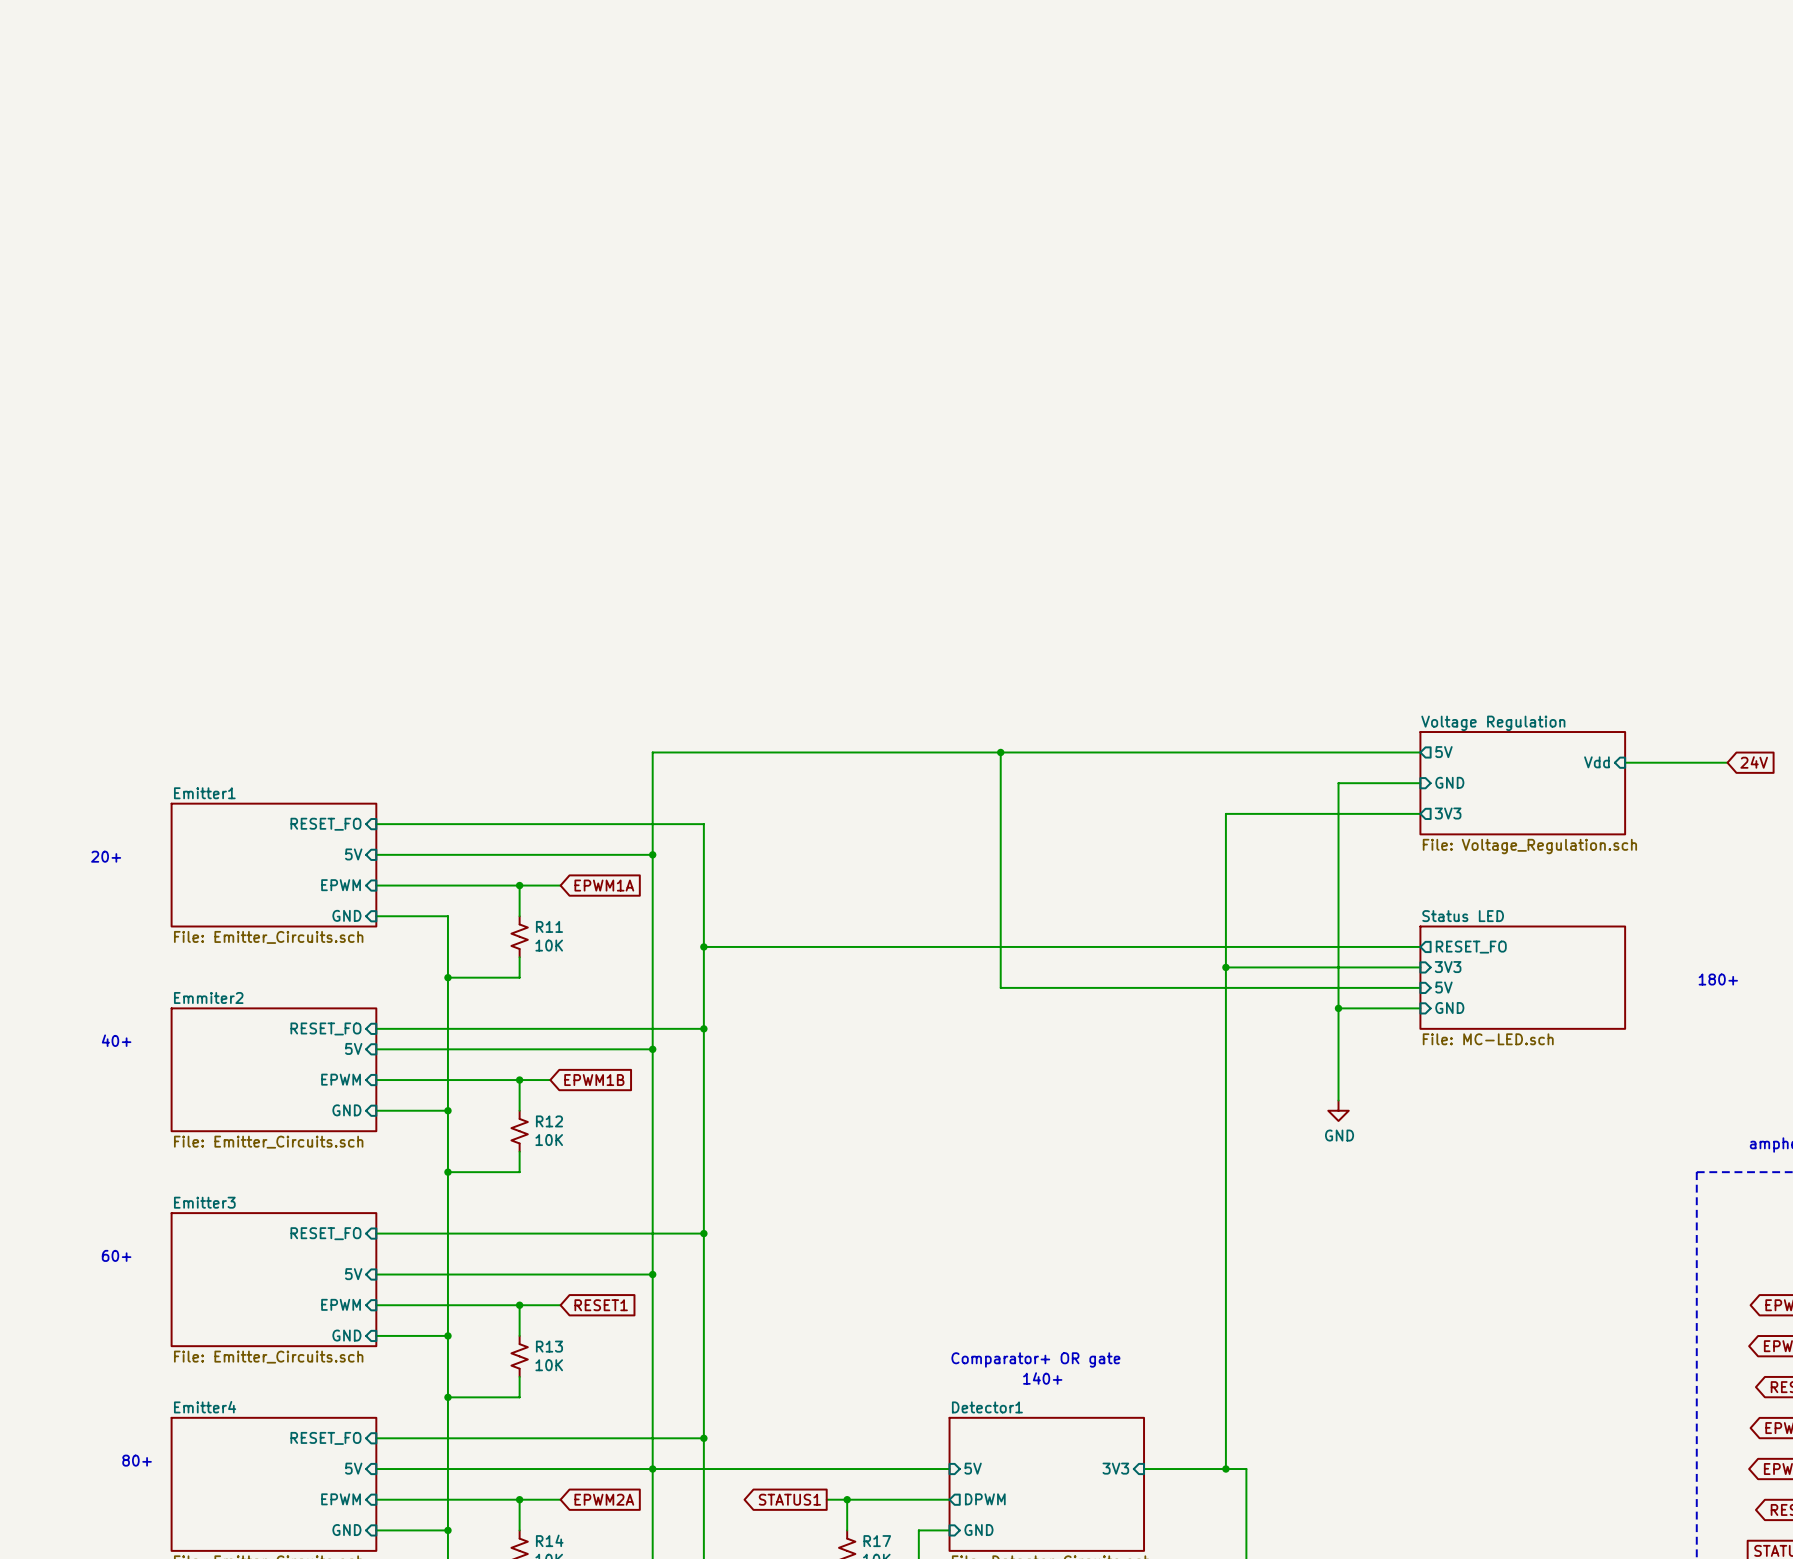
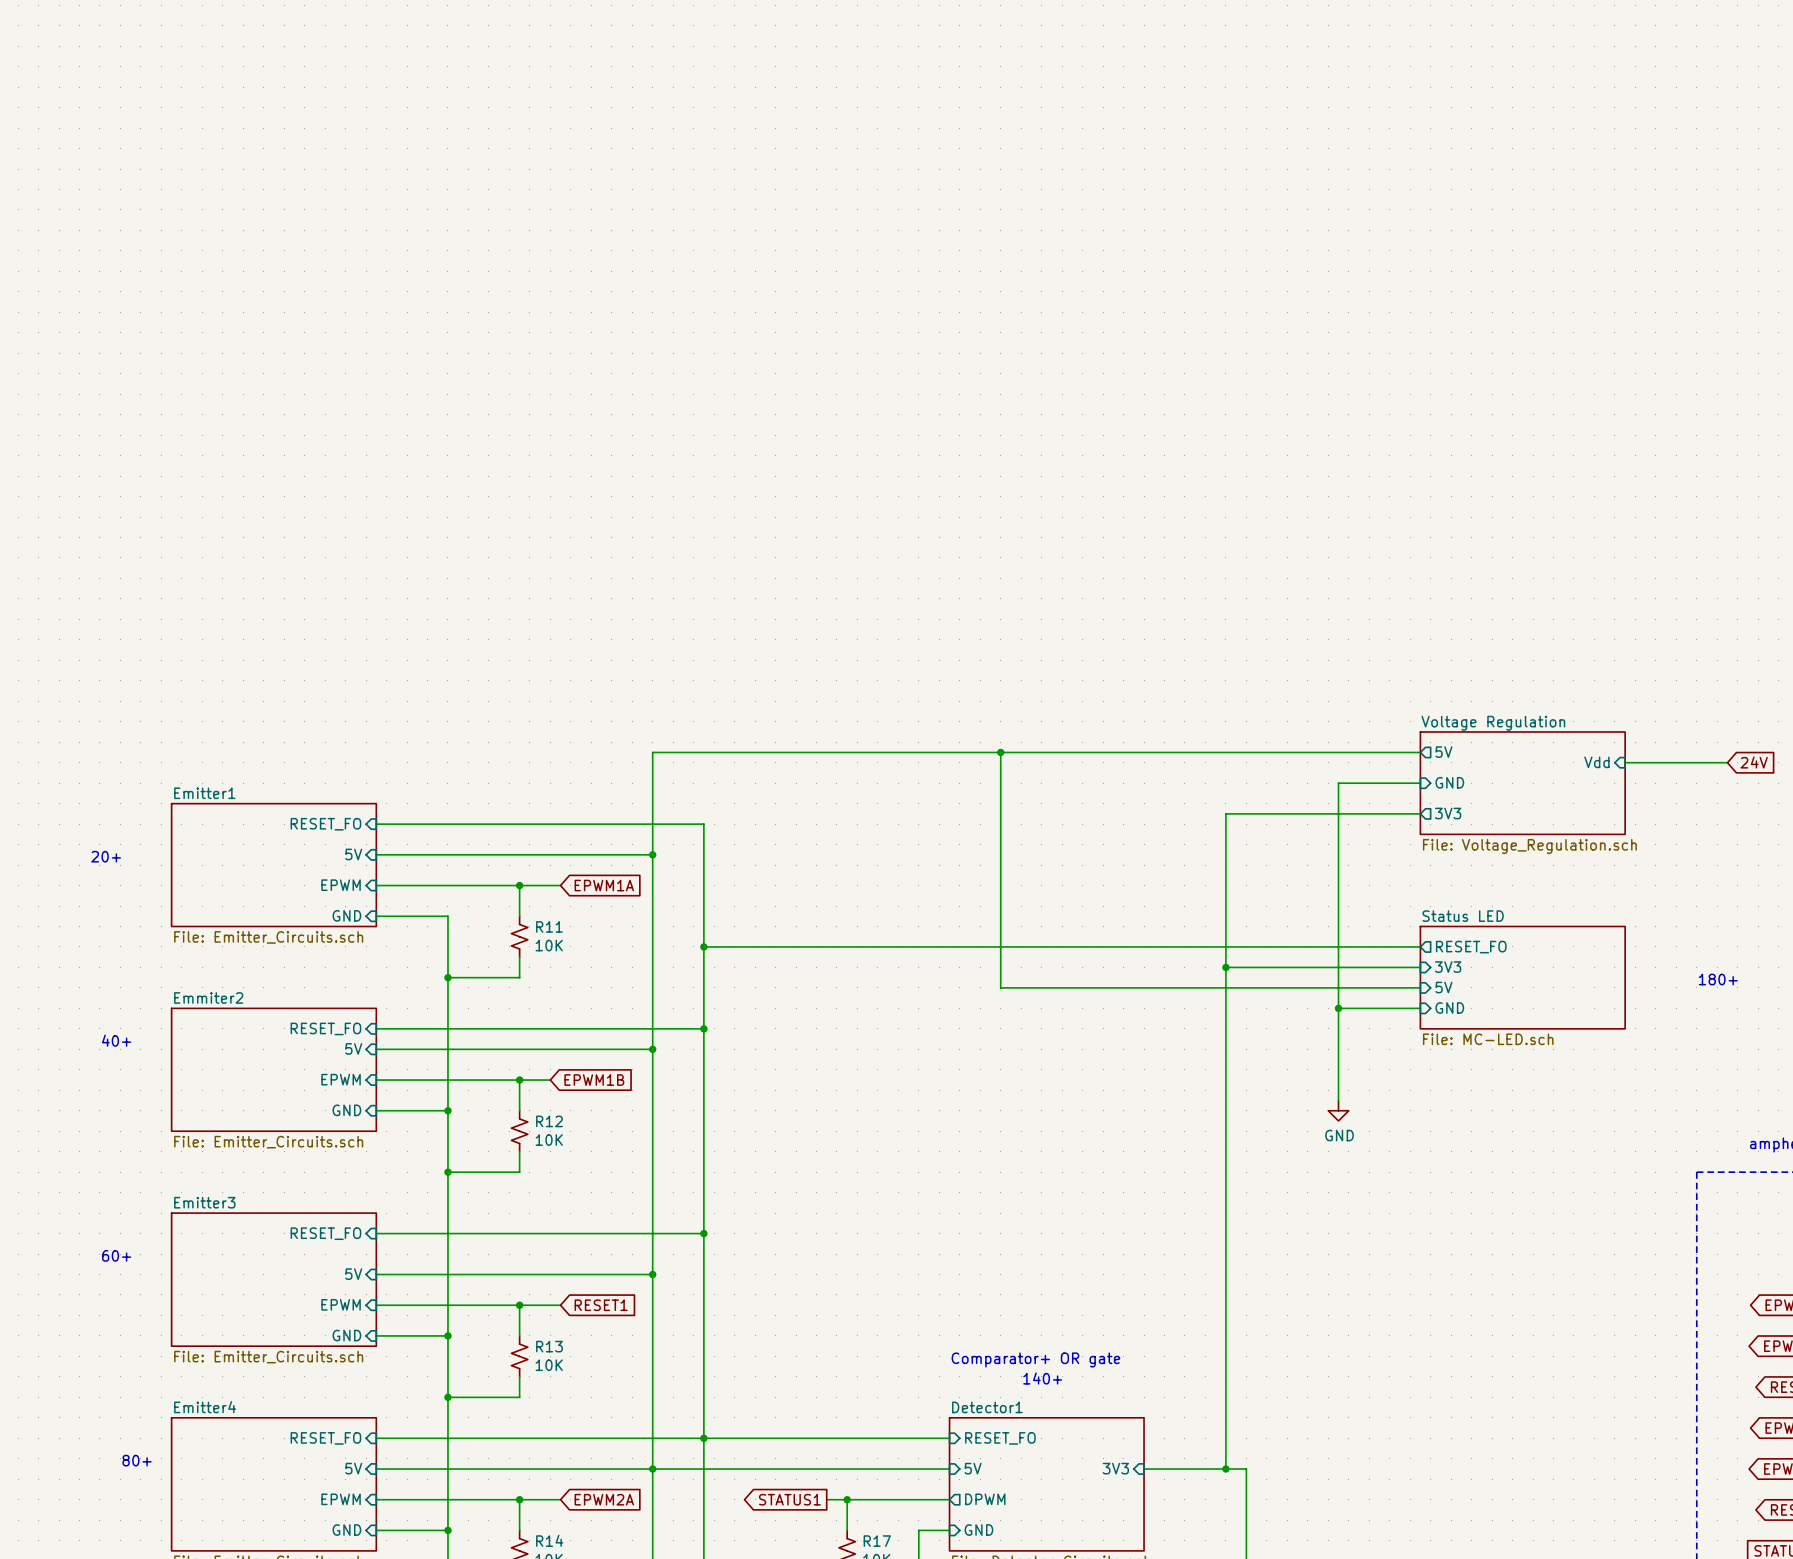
wire: none -> (703, 1438) (949, 1438)
sheet pin: none -> RESET_FO (1000, 1438)

